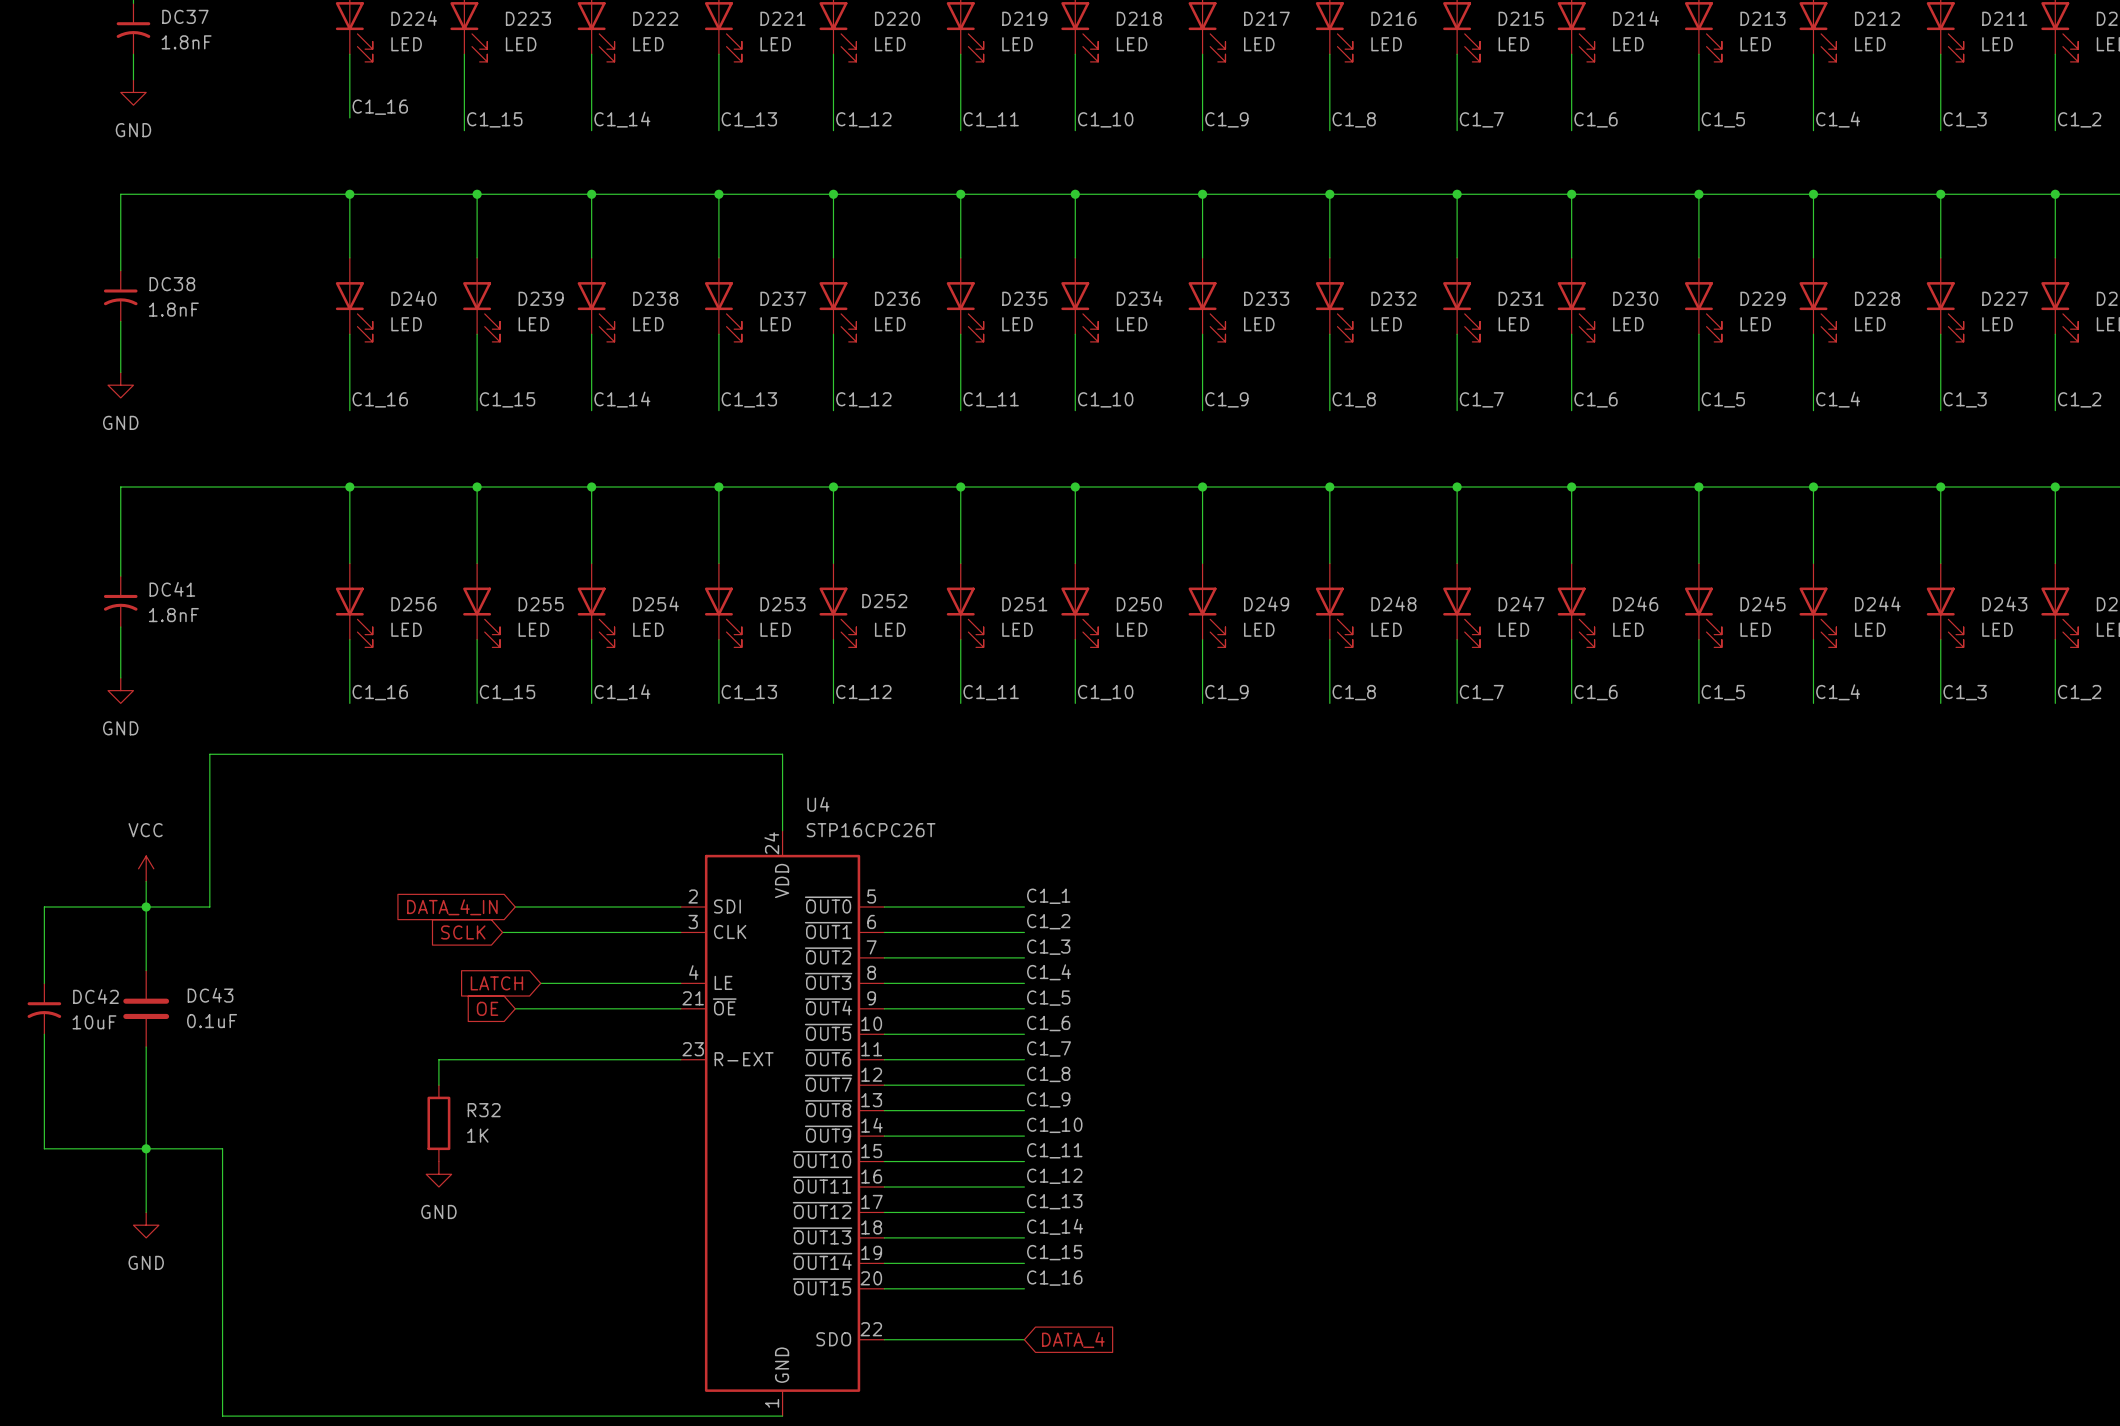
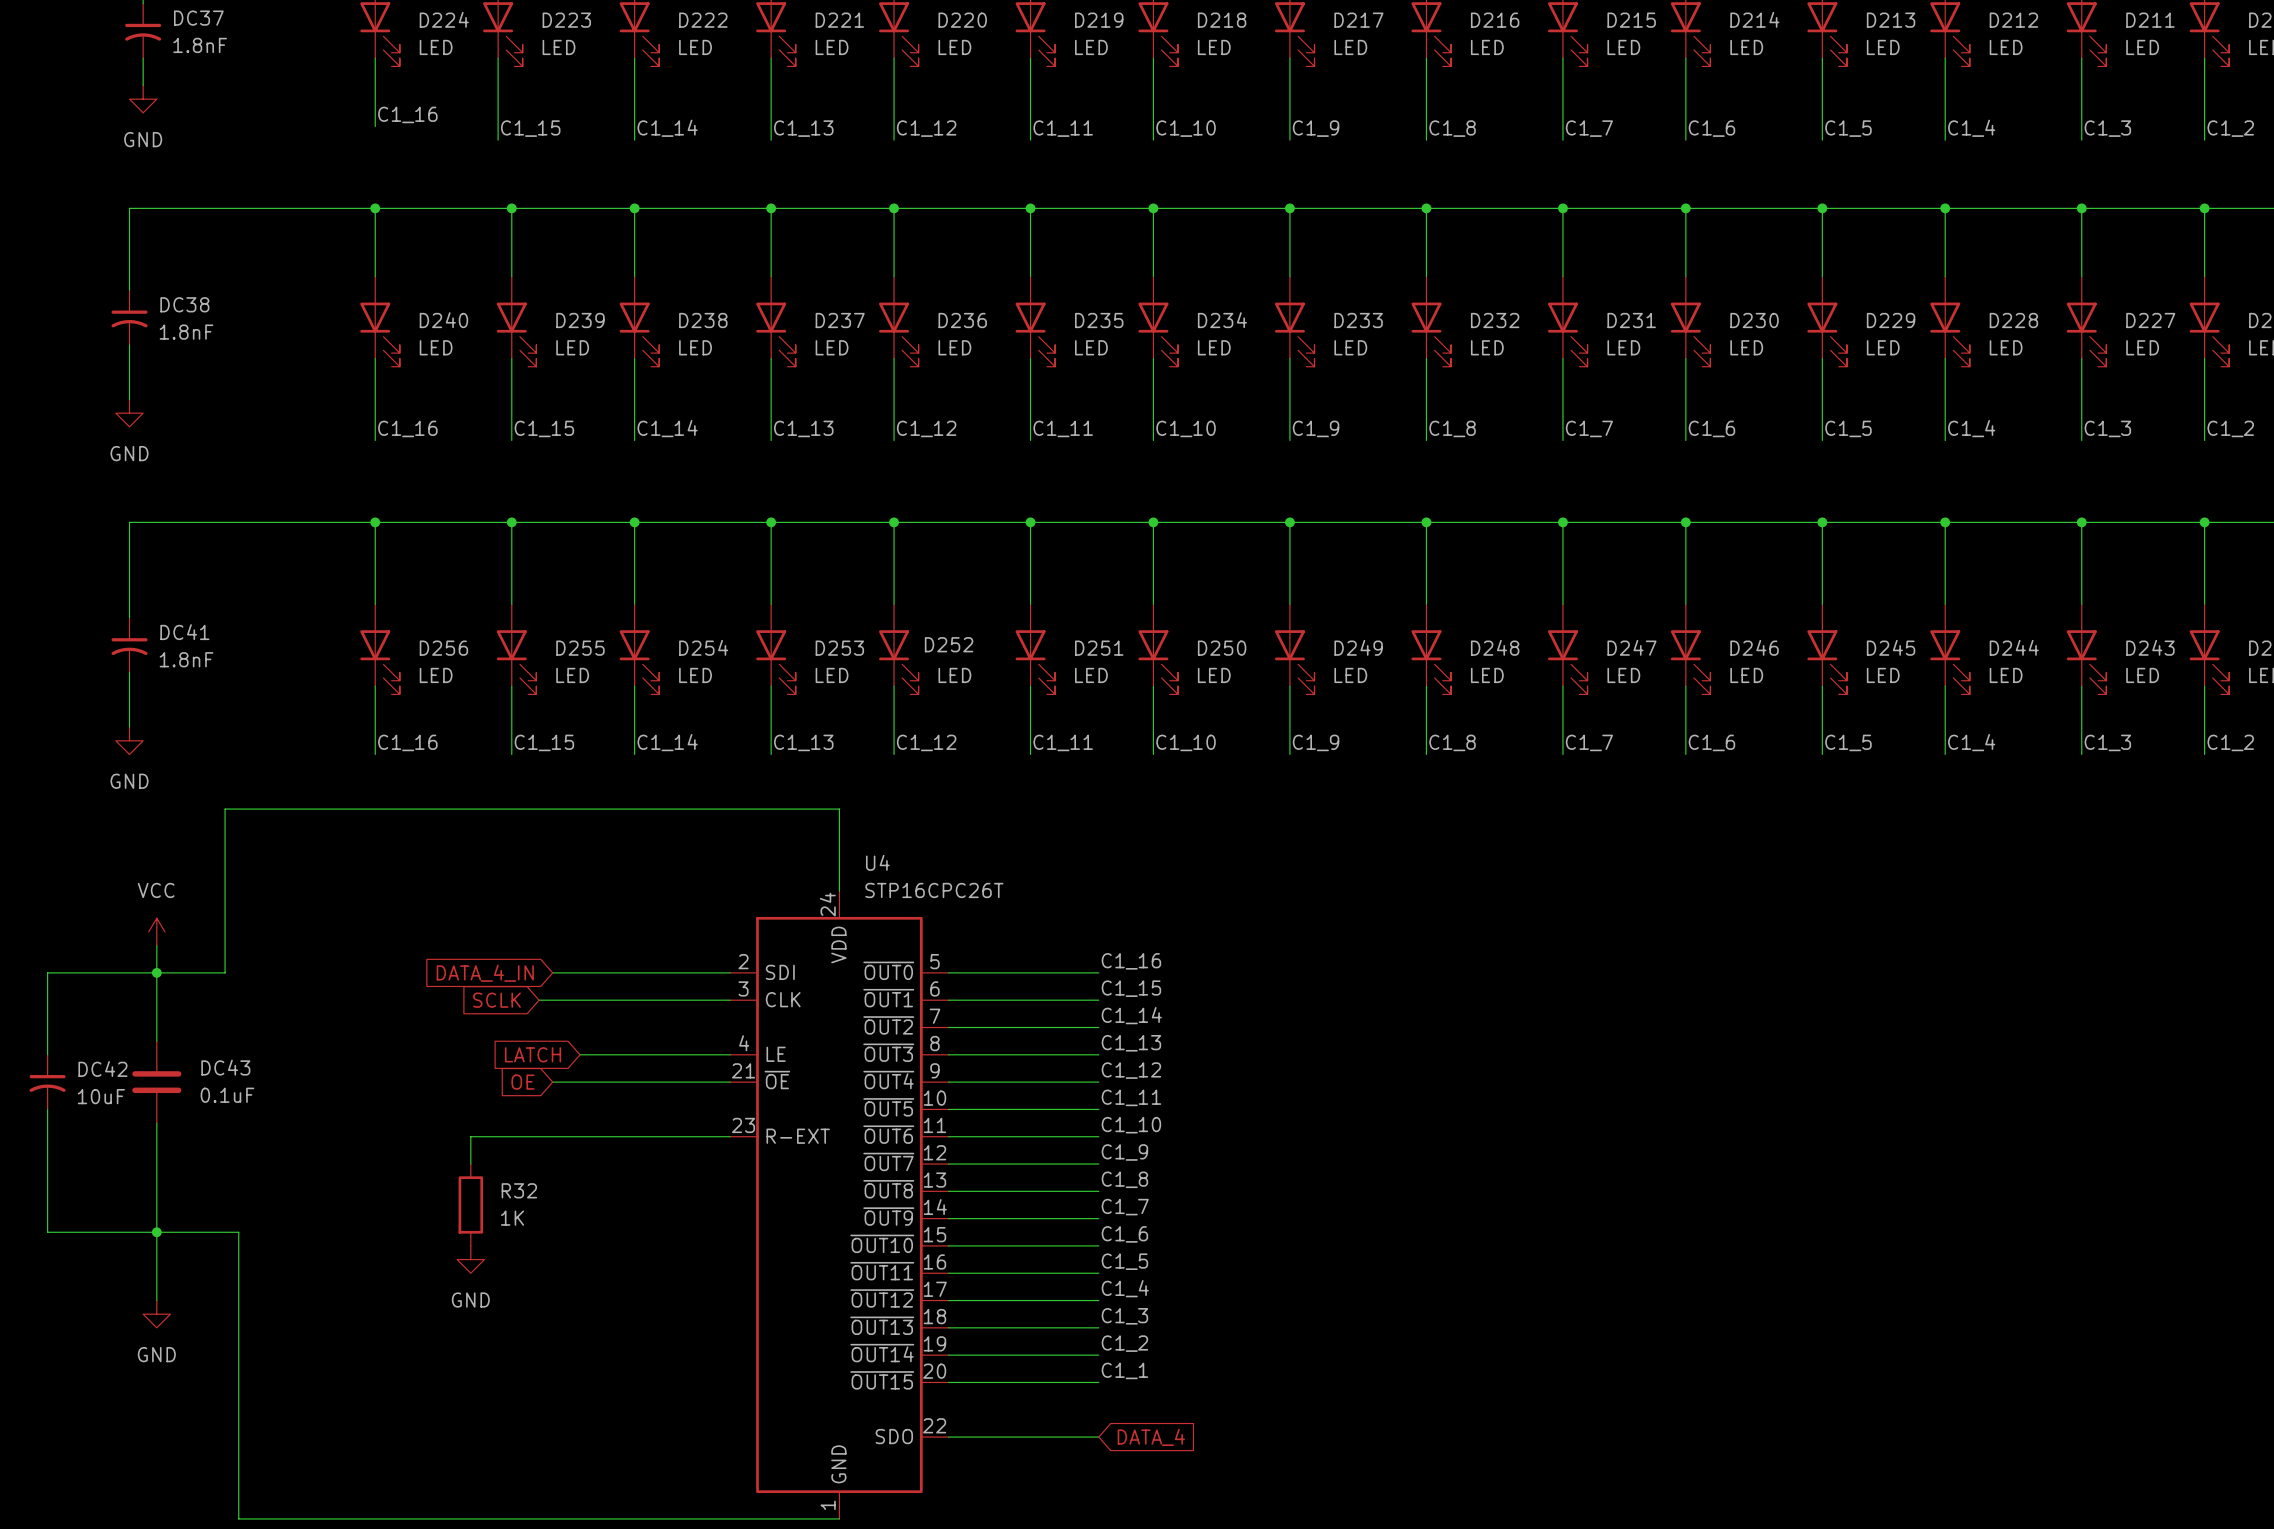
label: C1_1 (1048, 896) -> C1_16 (1131, 961)
label: C1_2 (1048, 921) -> C1_15 (1131, 988)
label: C1_3 (1048, 947) -> C1_14 (1131, 1015)
label: C1_4 (1049, 972) -> C1_13 (1131, 1043)
label: C1_5 (1048, 998) -> C1_12 (1131, 1070)
label: C1_6 (1048, 1023) -> C1_11 (1131, 1097)
label: C1_7 (1049, 1048) -> C1_10 (1131, 1125)
label: C1_8 (1048, 1074) -> C1_9 (1124, 1152)
label: C1_9 (1048, 1099) -> C1_8 (1124, 1179)
label: C1_10 (1054, 1125) -> C1_7 (1125, 1207)
label: C1_11 (1054, 1150) -> C1_6 (1124, 1234)
label: C1_12 (1054, 1176) -> C1_5 (1124, 1261)
label: C1_13 (1054, 1201) -> C1_4 (1125, 1288)
label: C1_14 (1055, 1226) -> C1_3 (1124, 1316)
label: C1_15 (1054, 1252) -> C1_2 (1124, 1343)
label: C1_16 (1054, 1278) -> C1_1 (1124, 1370)

